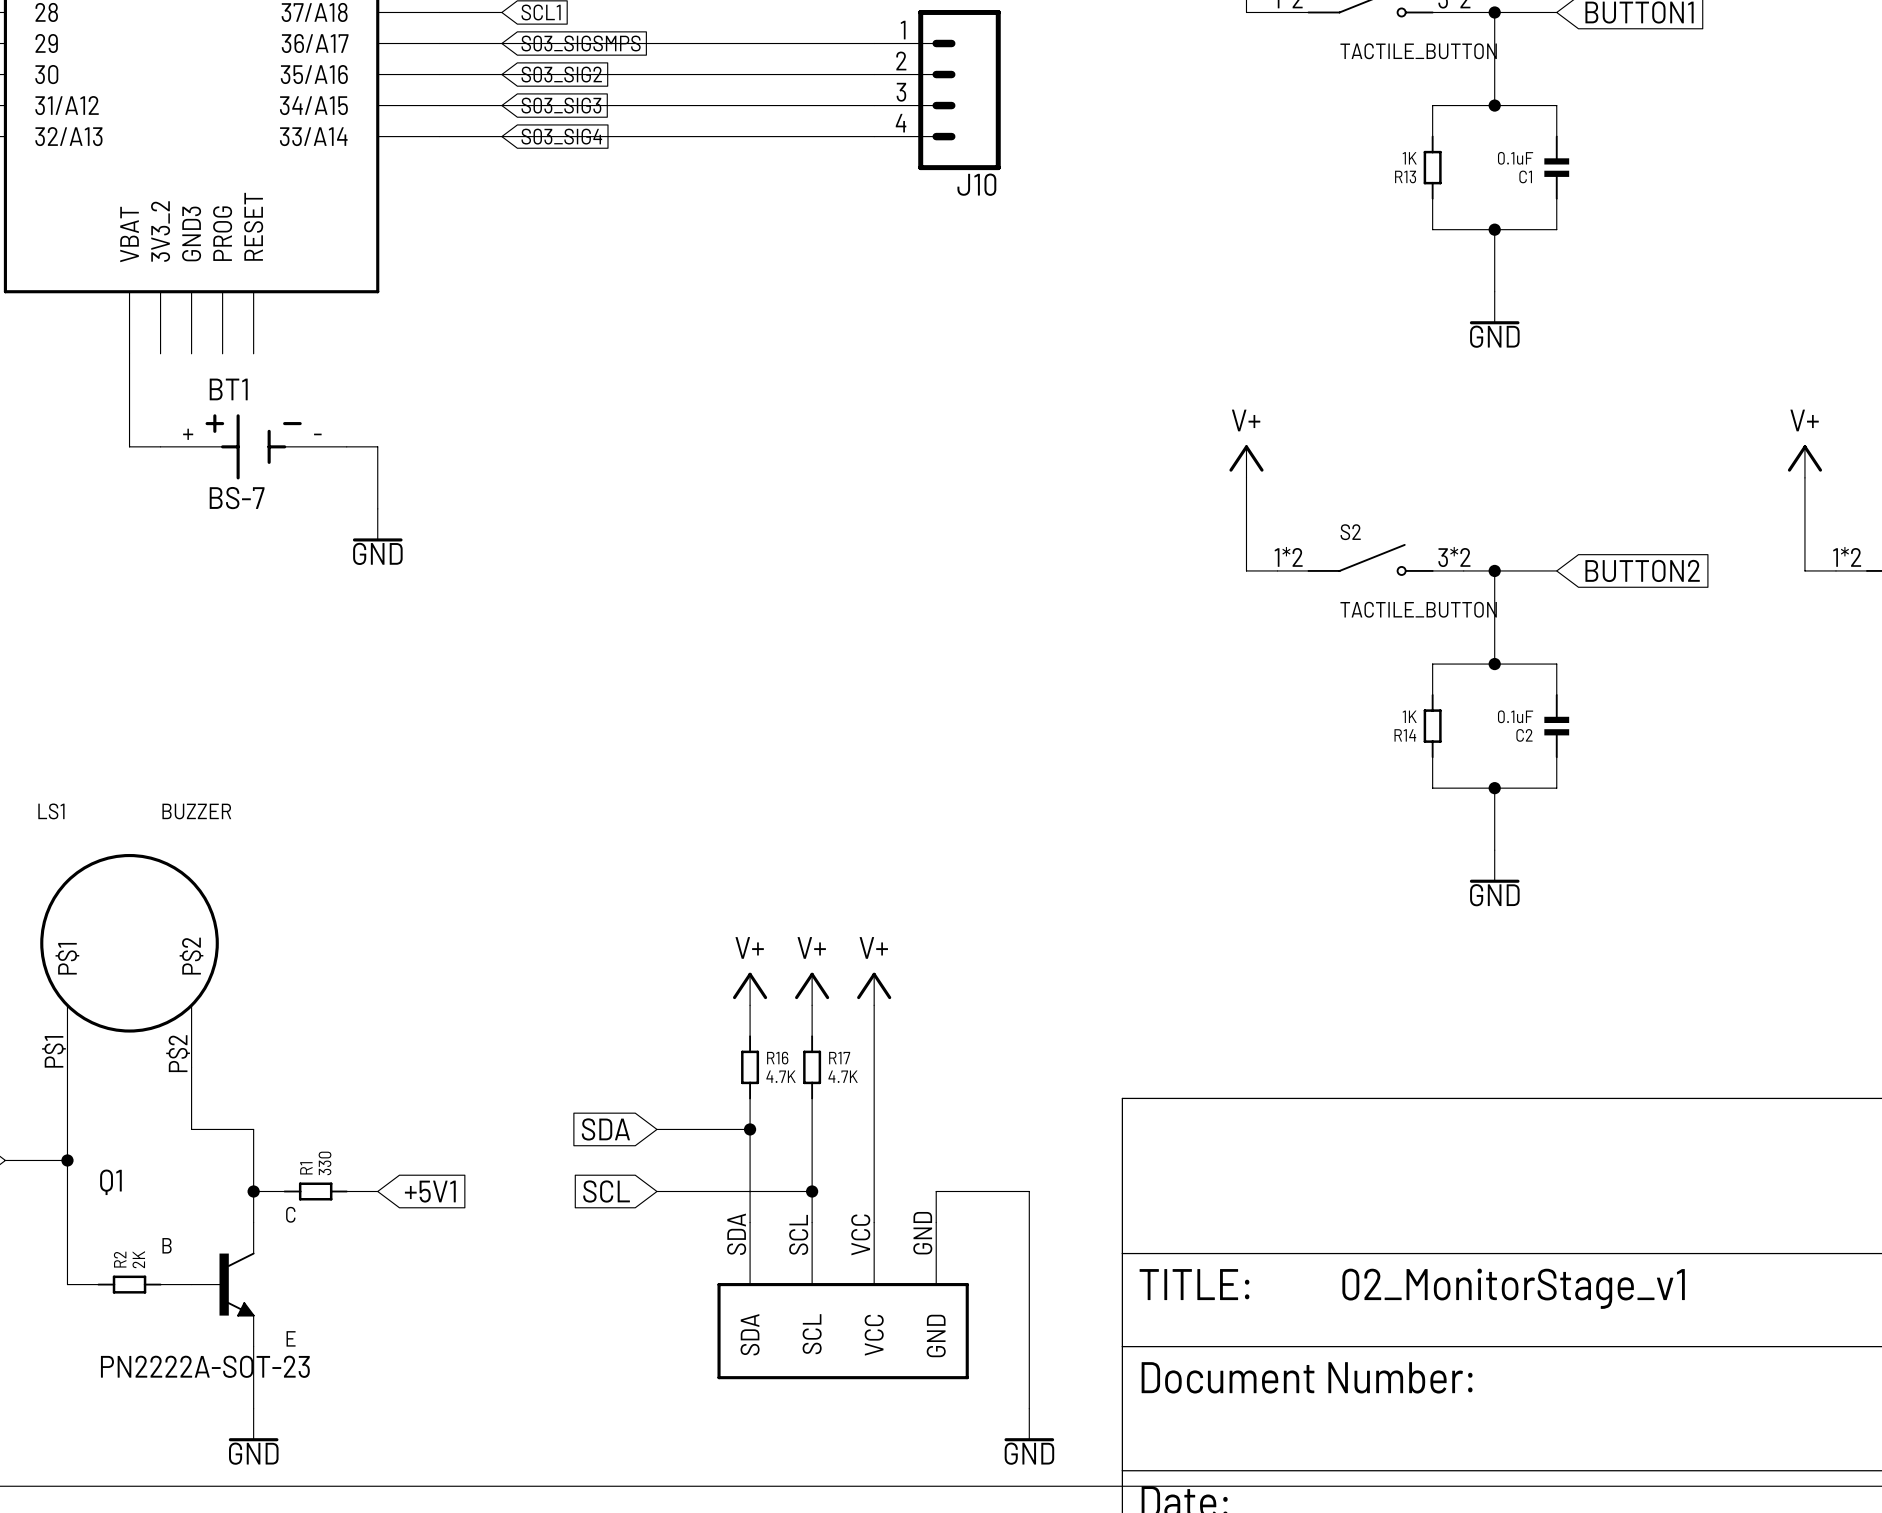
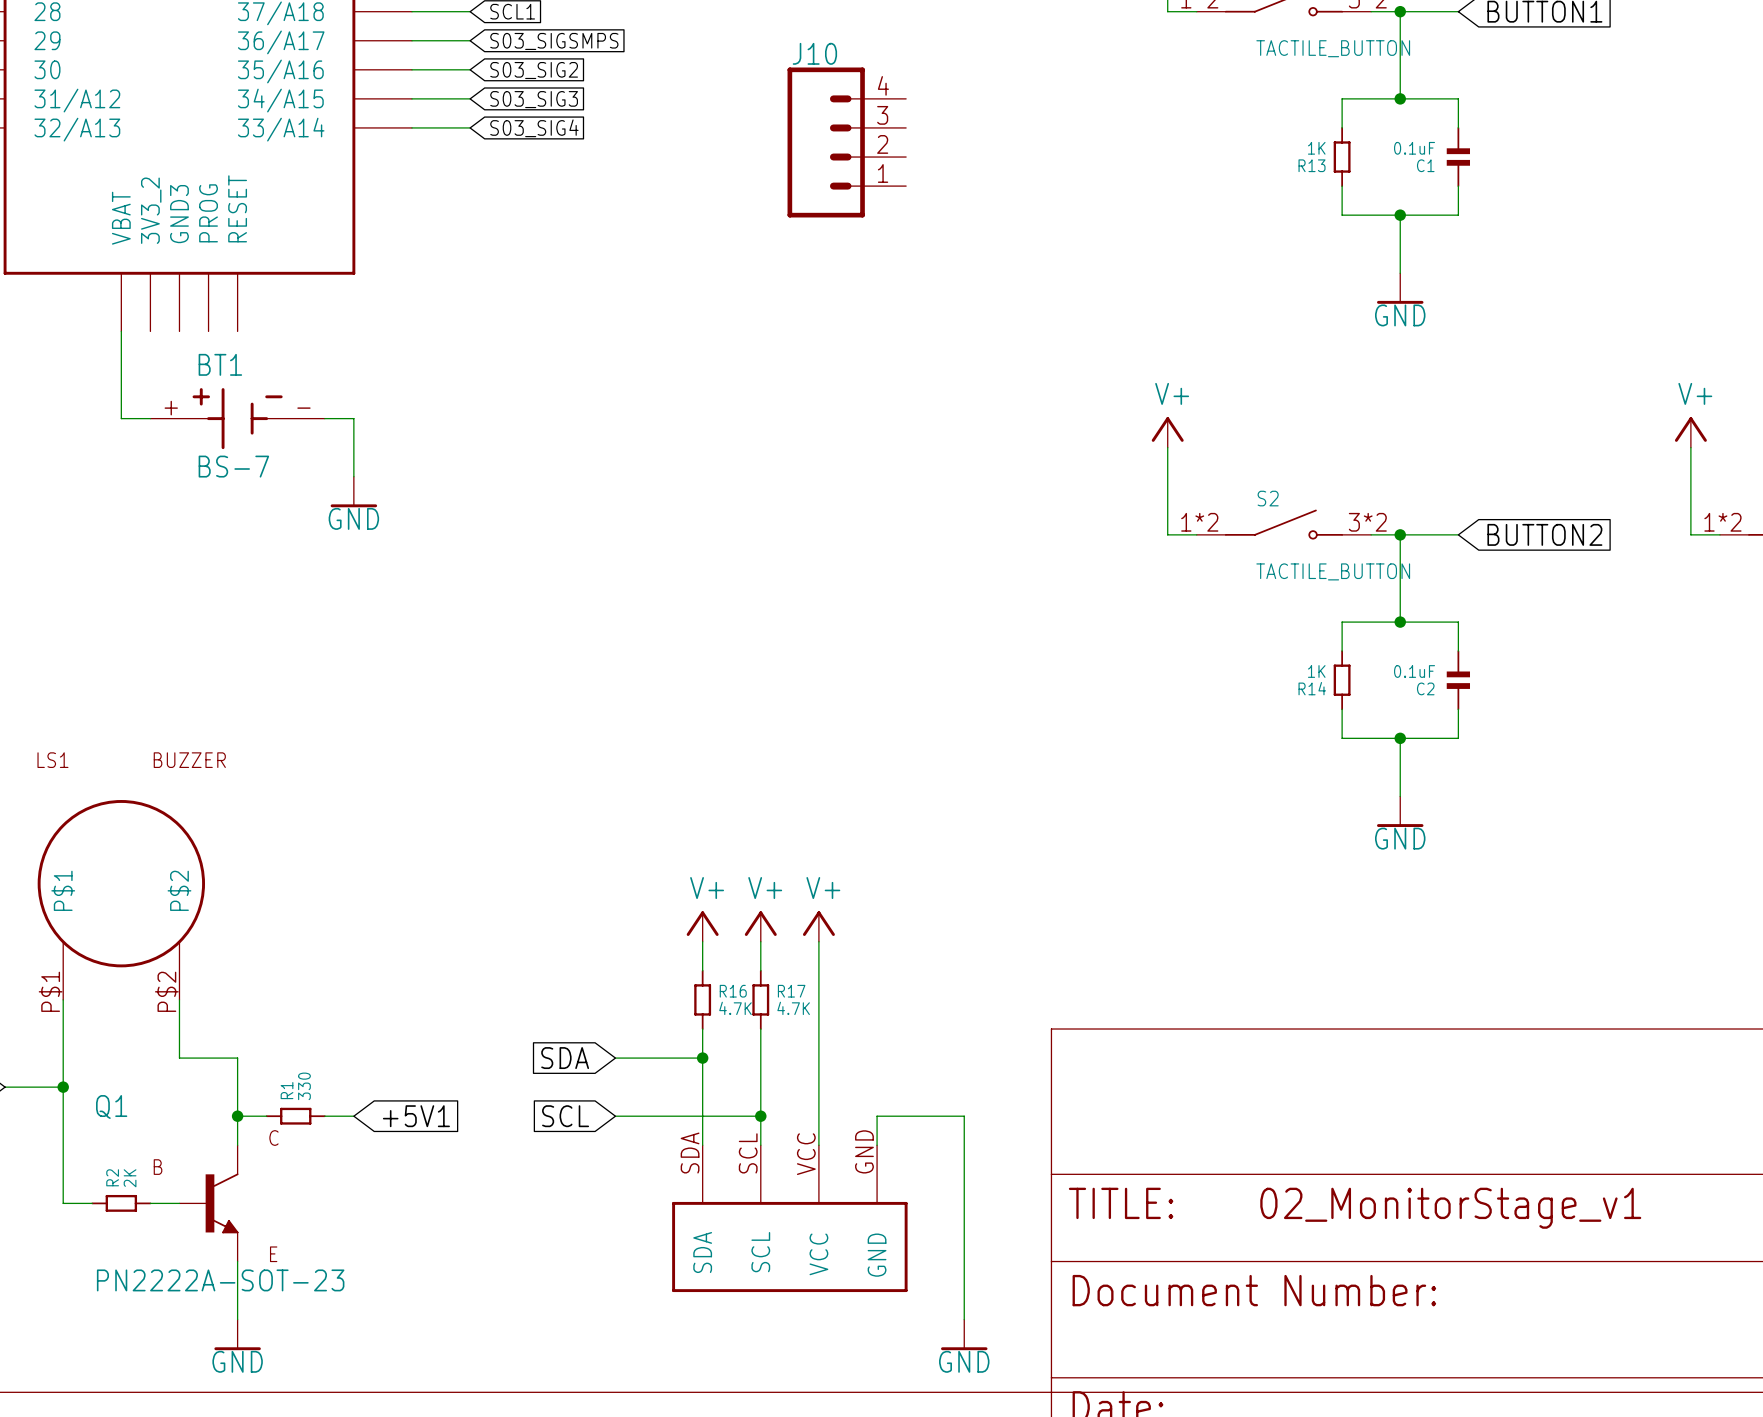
wire: (501, 43) (874, 43) -> none
wire: (501, 74) (874, 74) -> none
J10 rotation: 0° (959, 90) -> 180° (826, 142)
wire: (501, 105) (874, 105) -> none
wire: (501, 136) (874, 136) -> none

